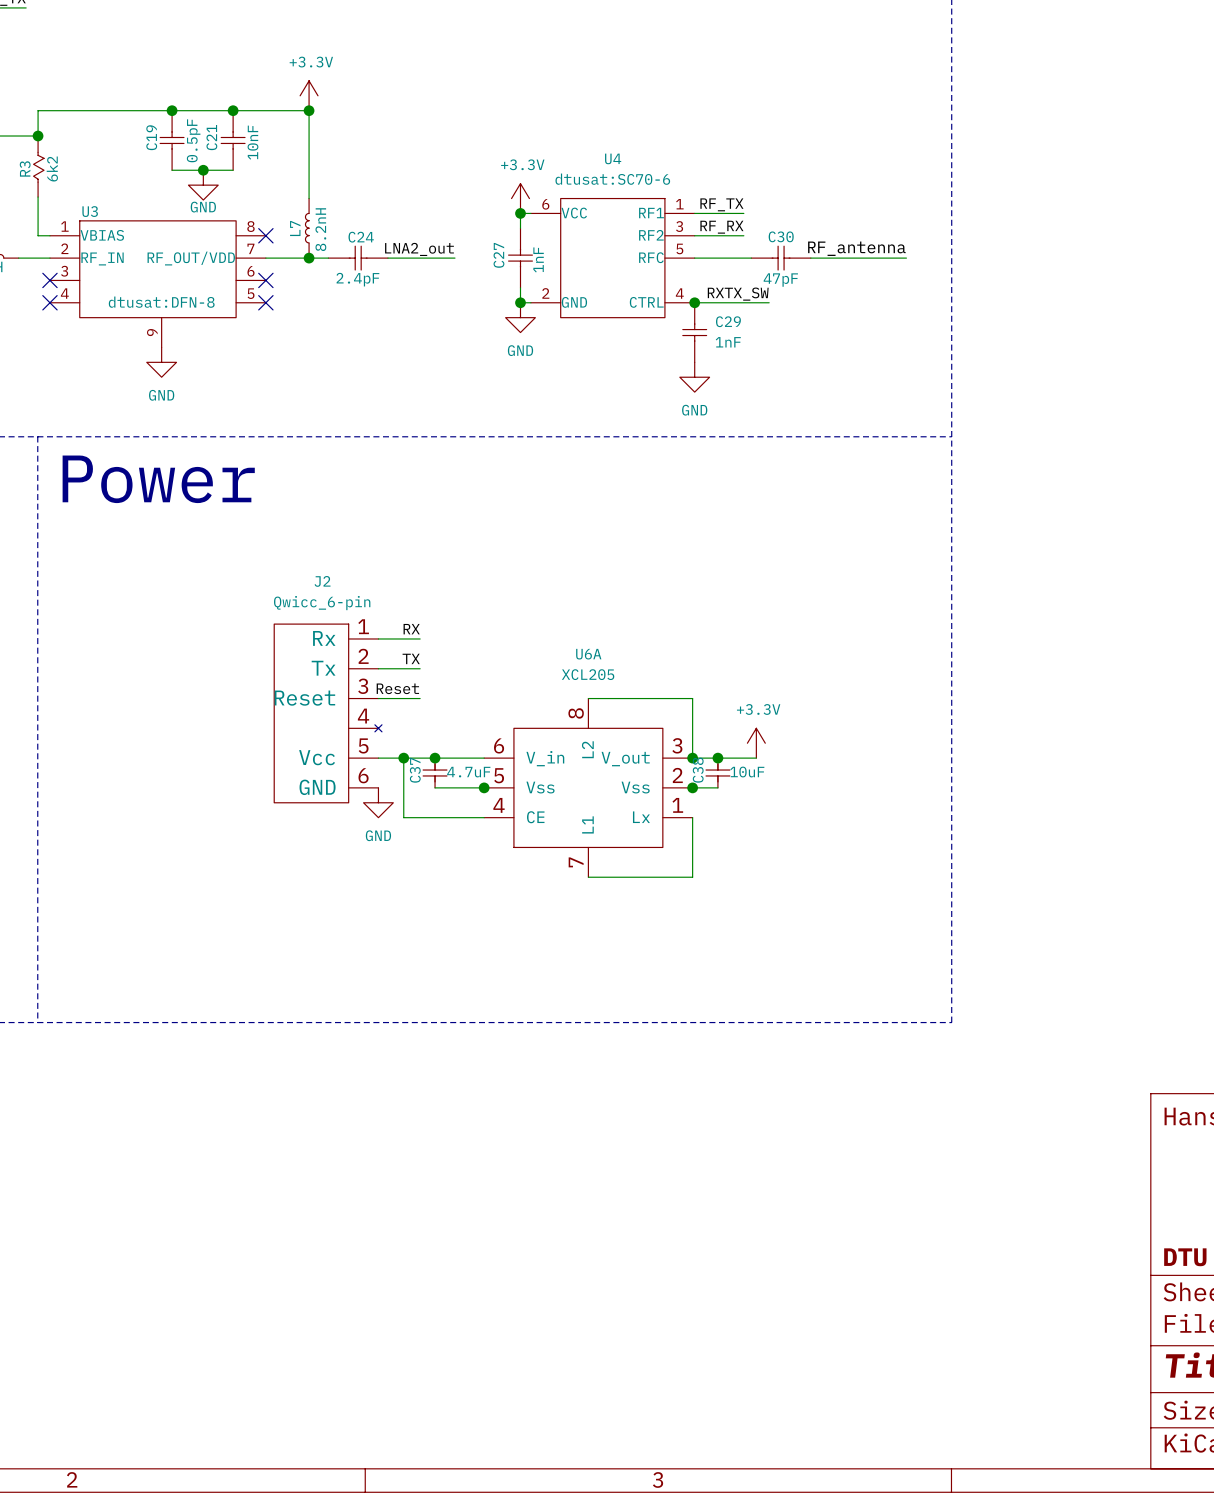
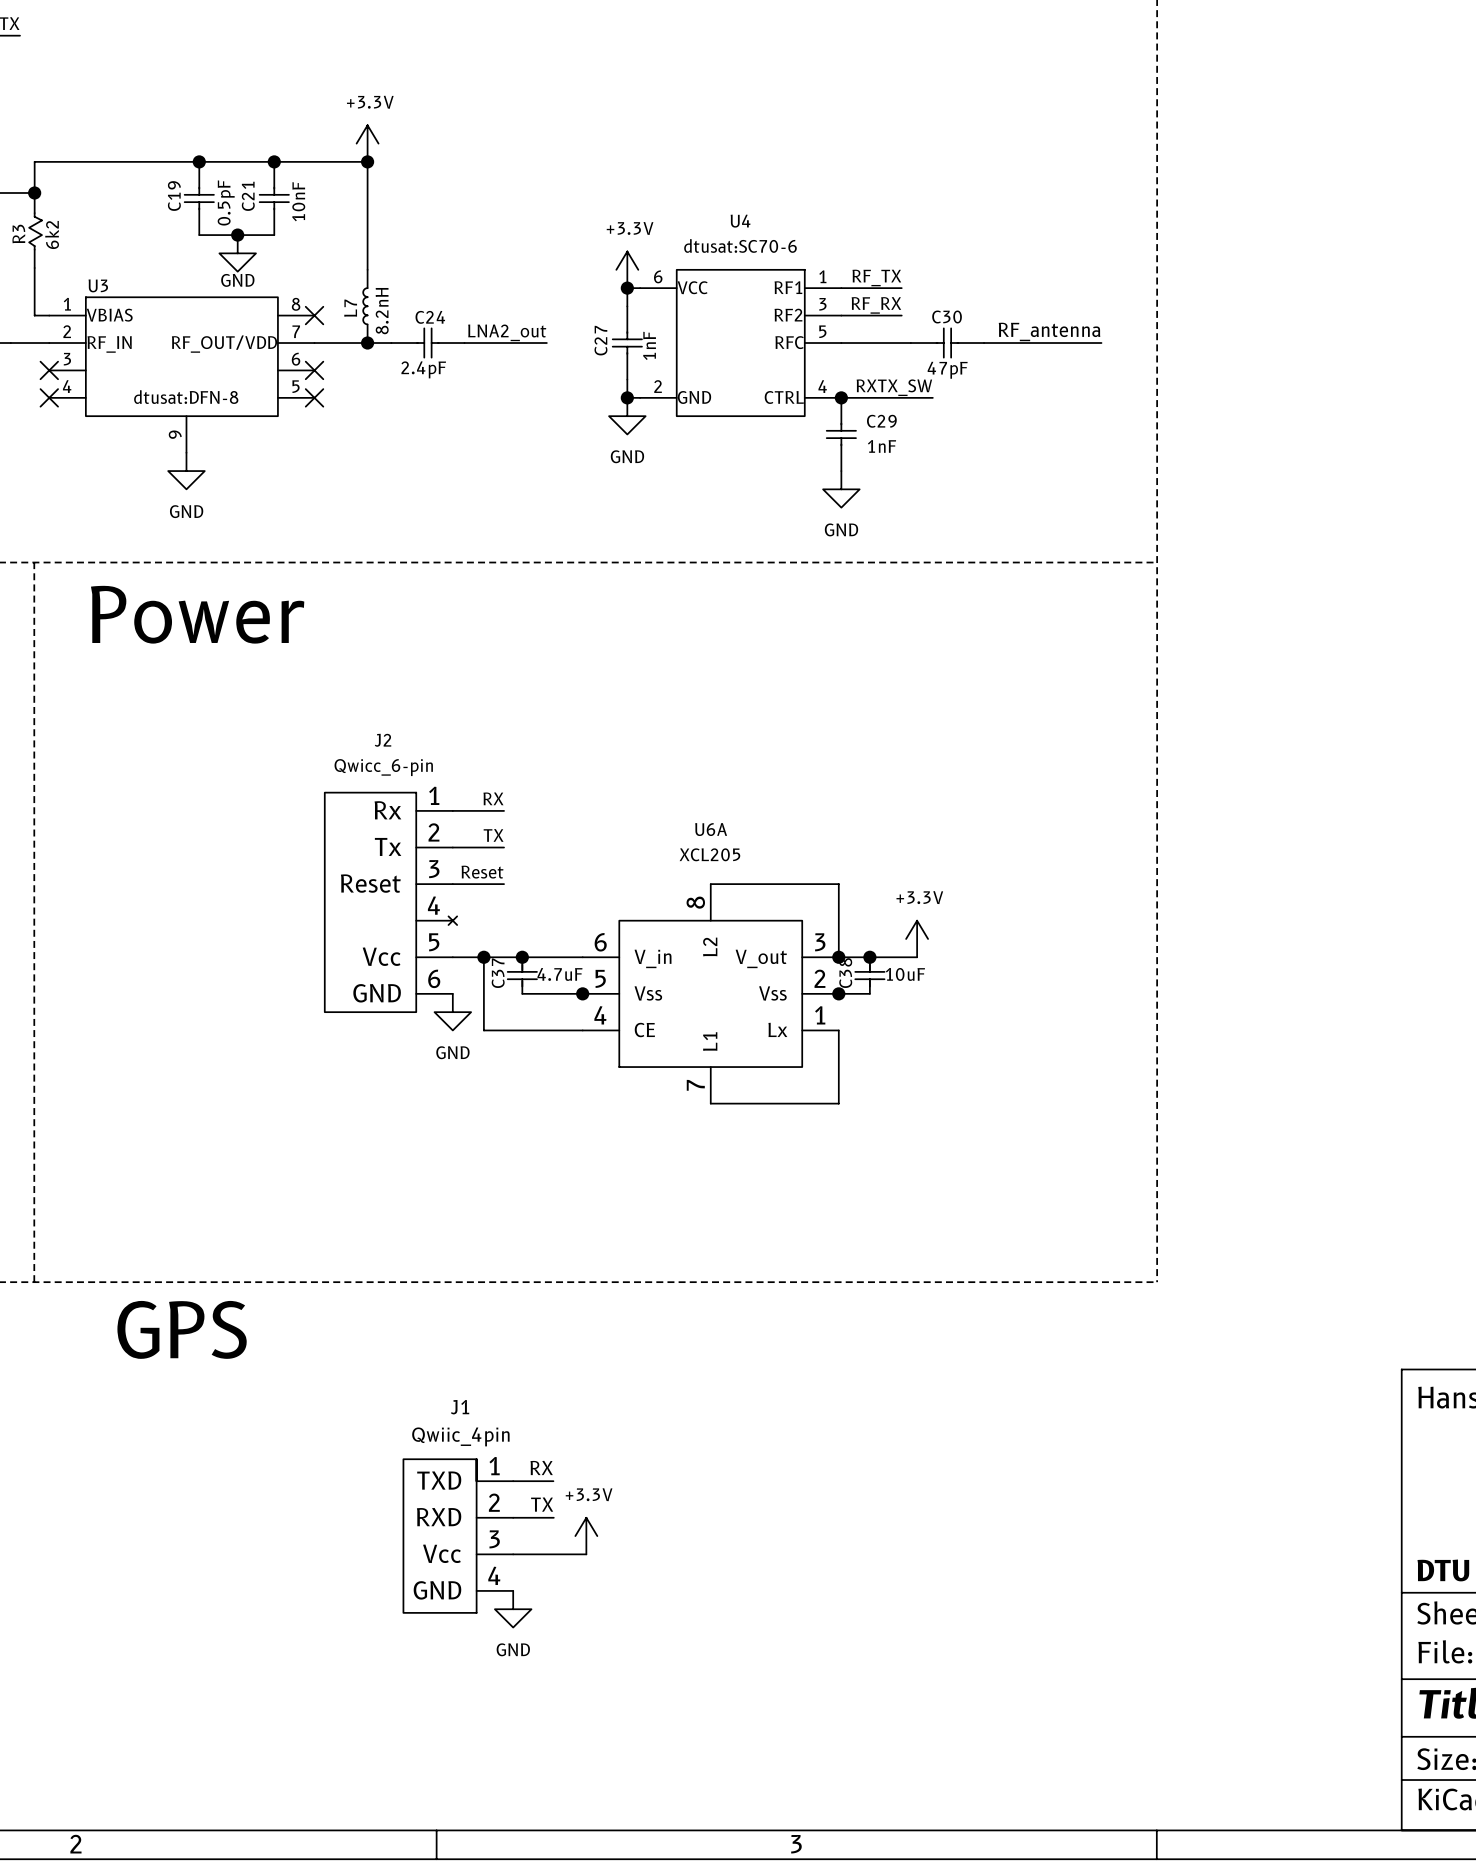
text: none -> GPS (182, 1329)
label: none -> RX (541, 1467)
wire: none -> (513, 1481) (553, 1481)
label: none -> TX (542, 1504)
wire: none -> (513, 1517) (553, 1517)
J1: none -> Qwiic_4pin (458, 1536)
power symbol: none -> +3.3V (586, 1536)
wire: none -> (513, 1554) (586, 1554)
power symbol: none -> GND (513, 1609)

